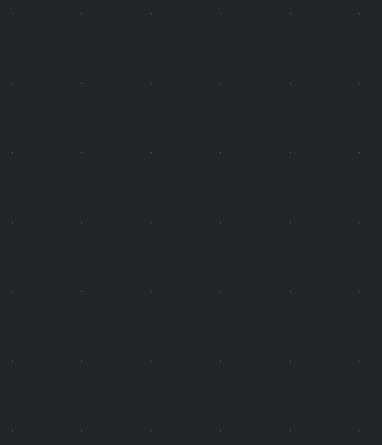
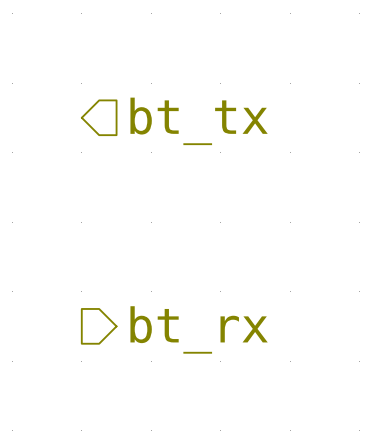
hierarchical label: none -> bt_tx (199, 121)
hierarchical label: none -> bt_rx (199, 329)

